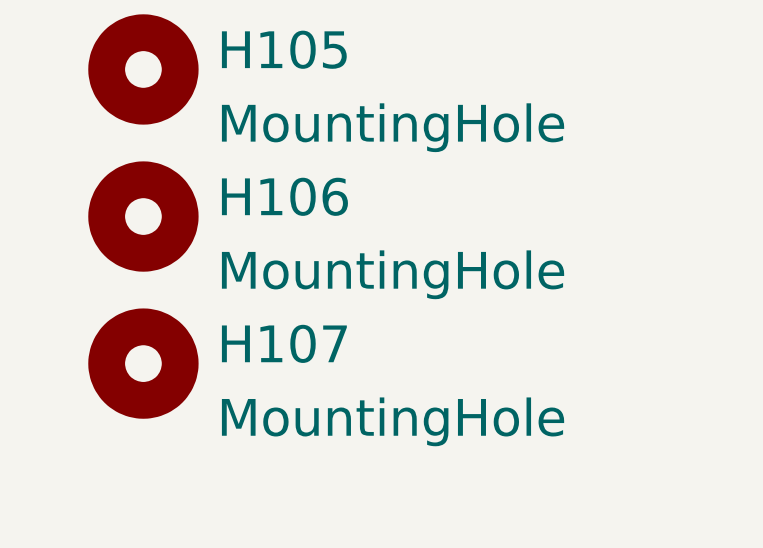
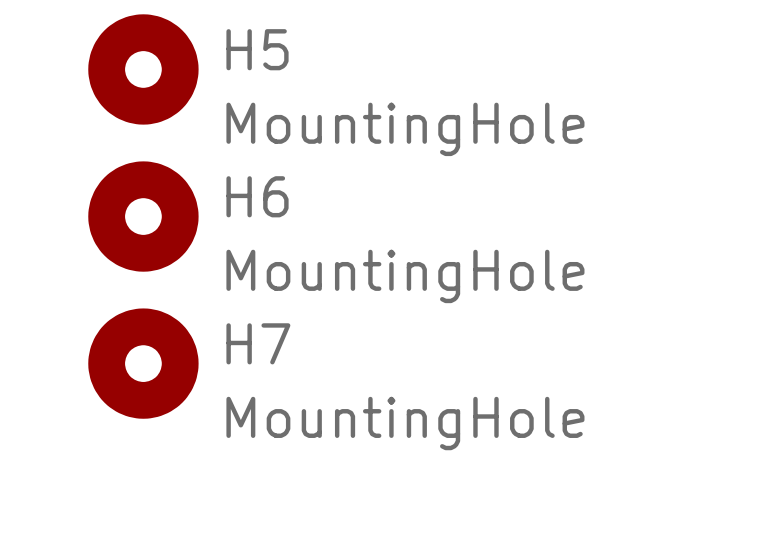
H105 name: H105 (284, 49) -> H5 (257, 49)
H106 name: H106 (284, 196) -> H6 (257, 196)
H107 name: H107 (284, 343) -> H7 (258, 343)

